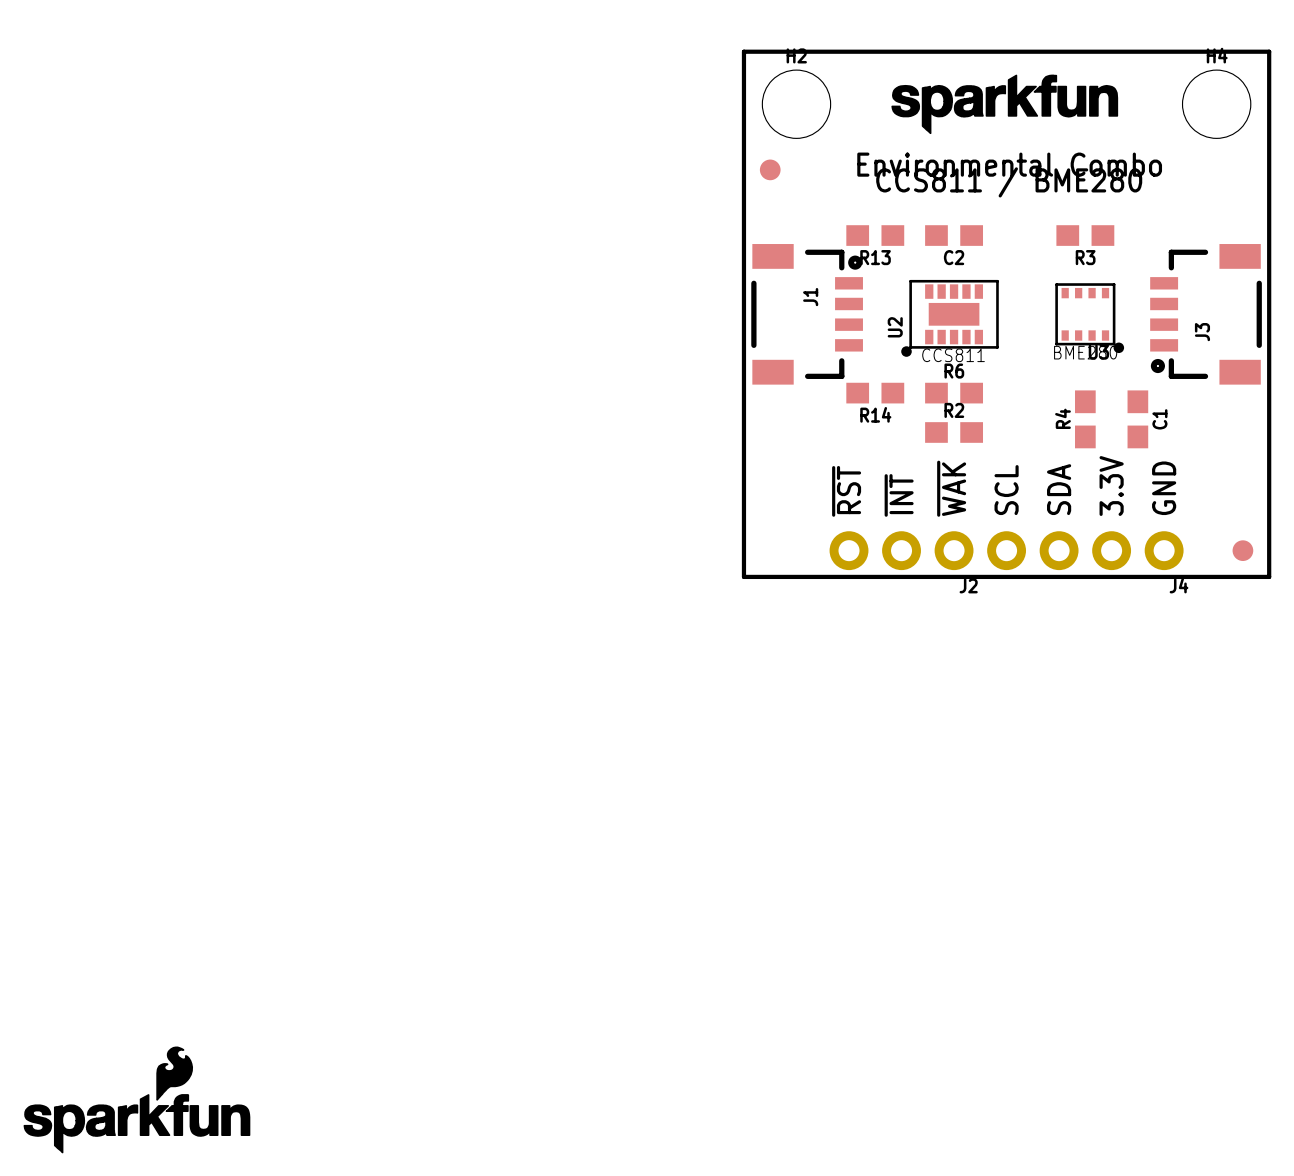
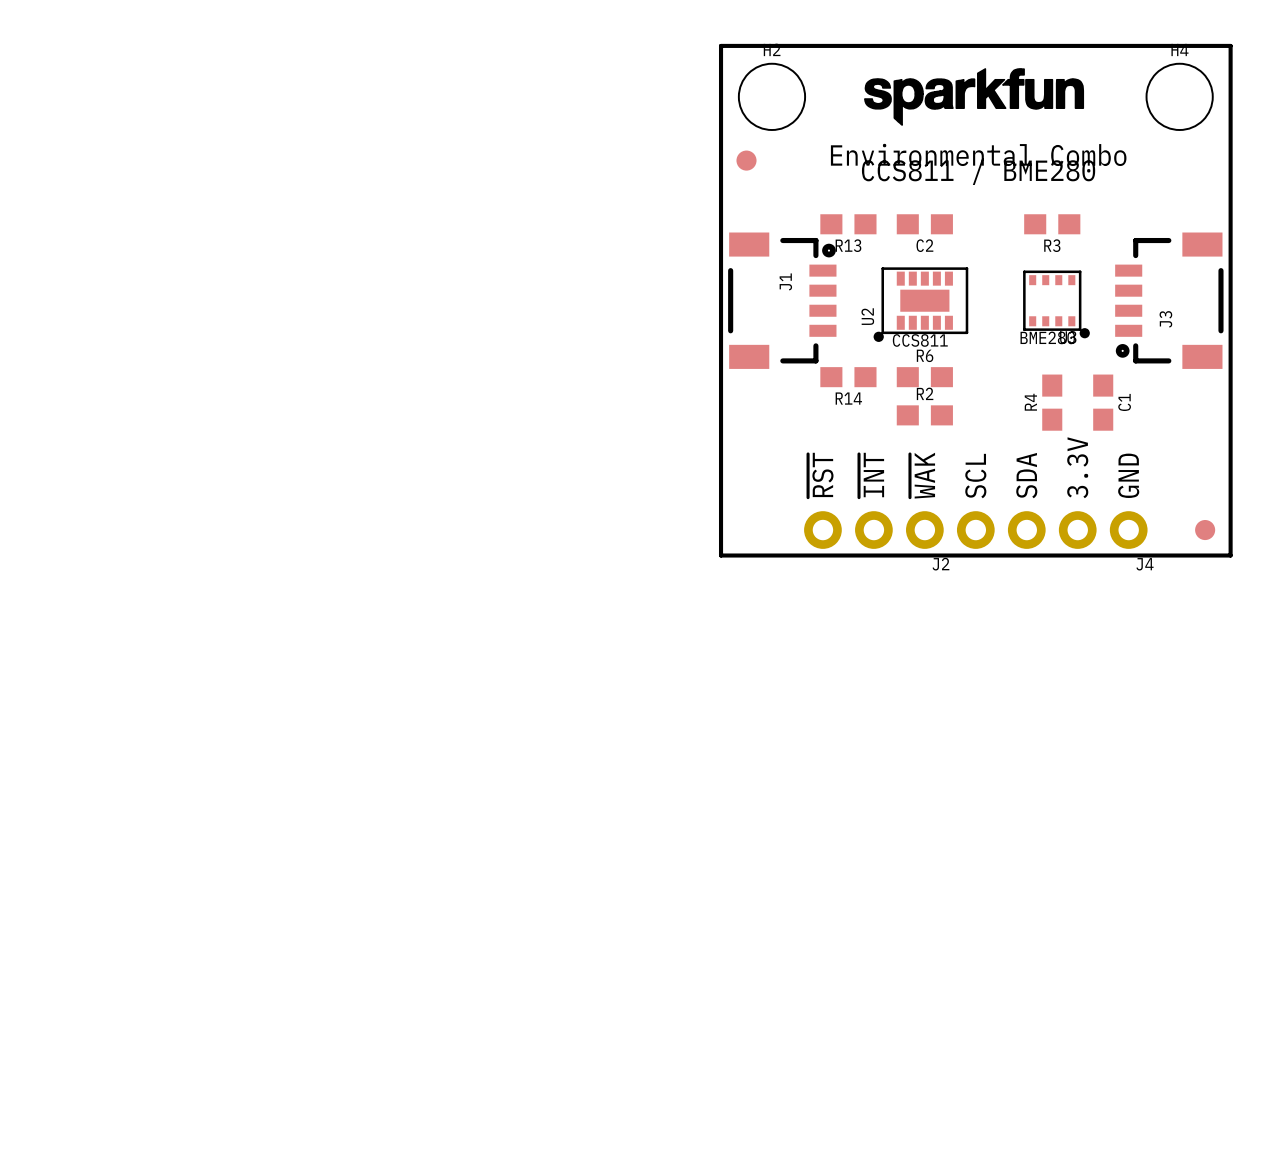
drawing: [23, 1046, 251, 1154] -> none

